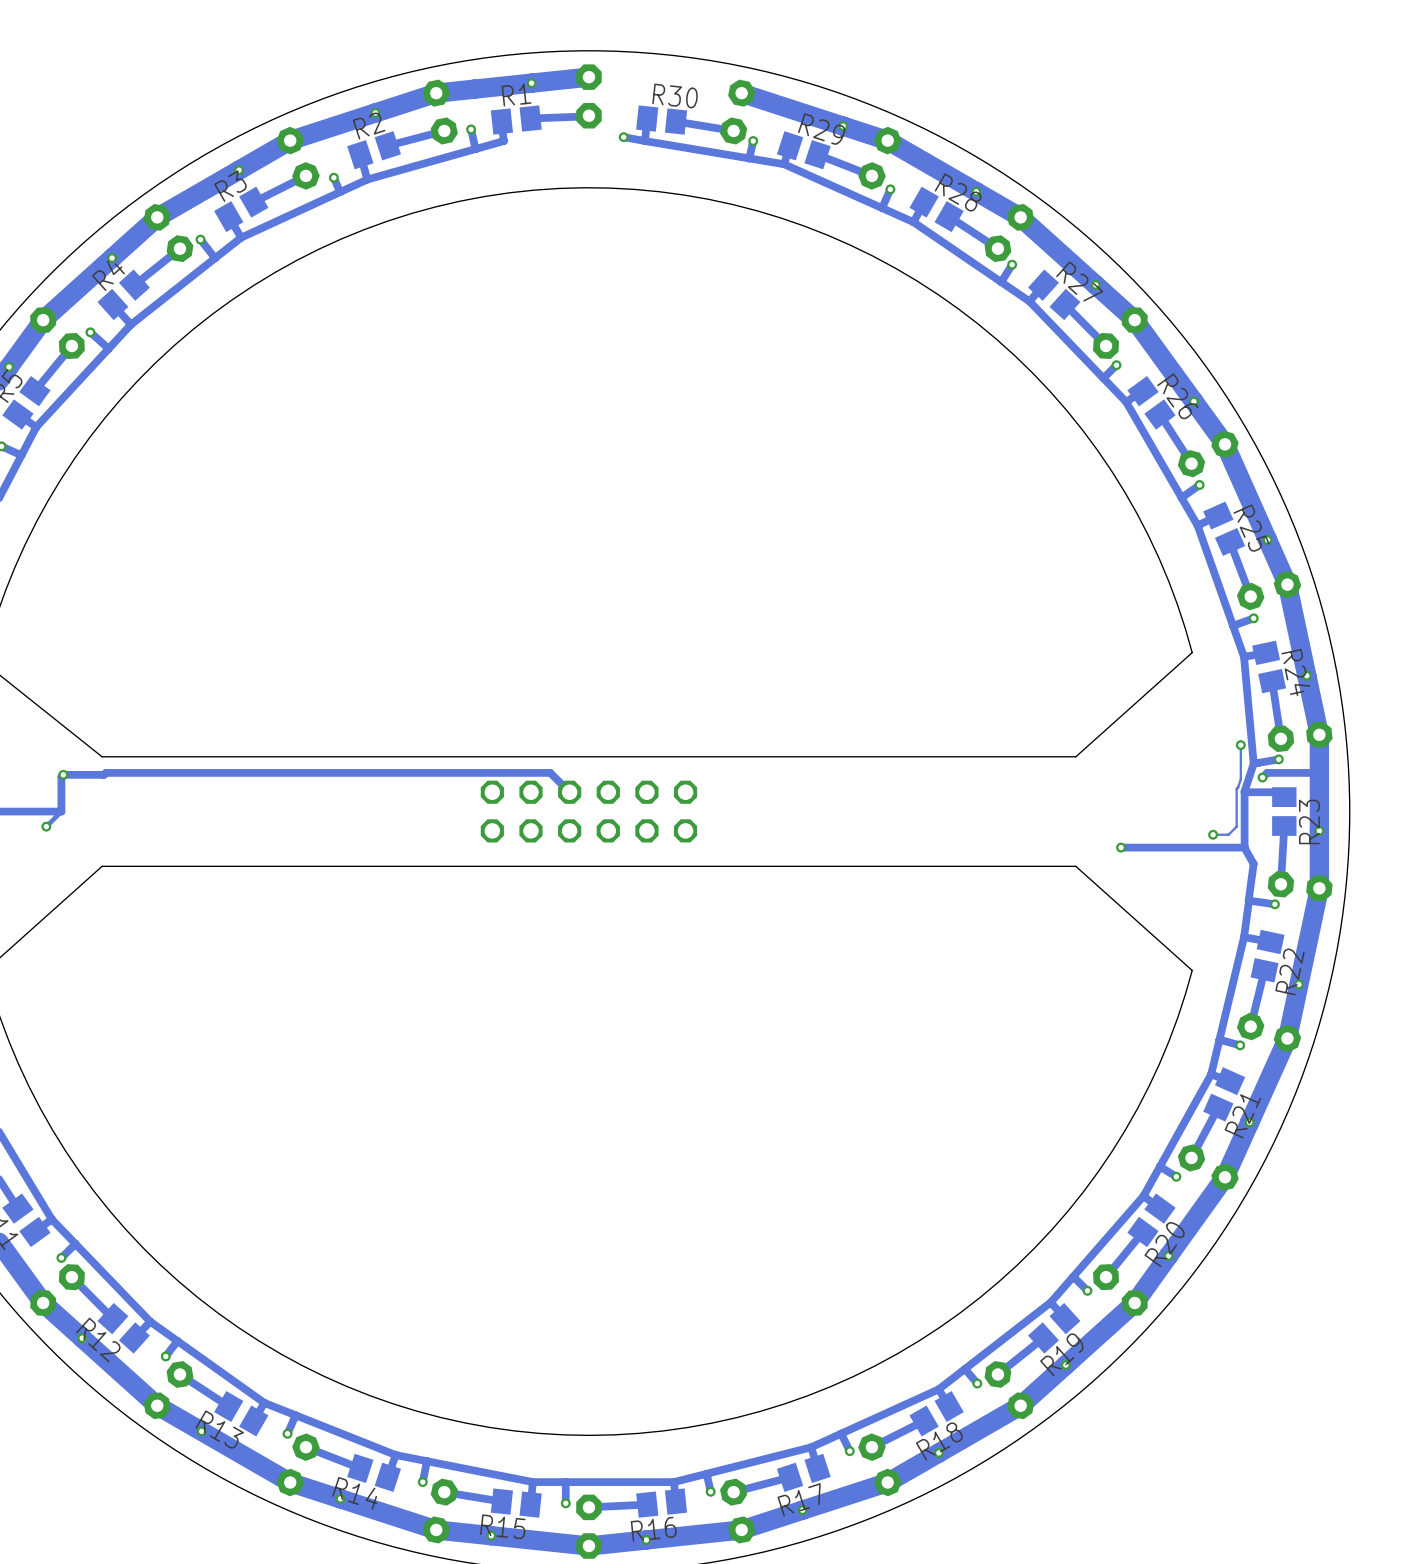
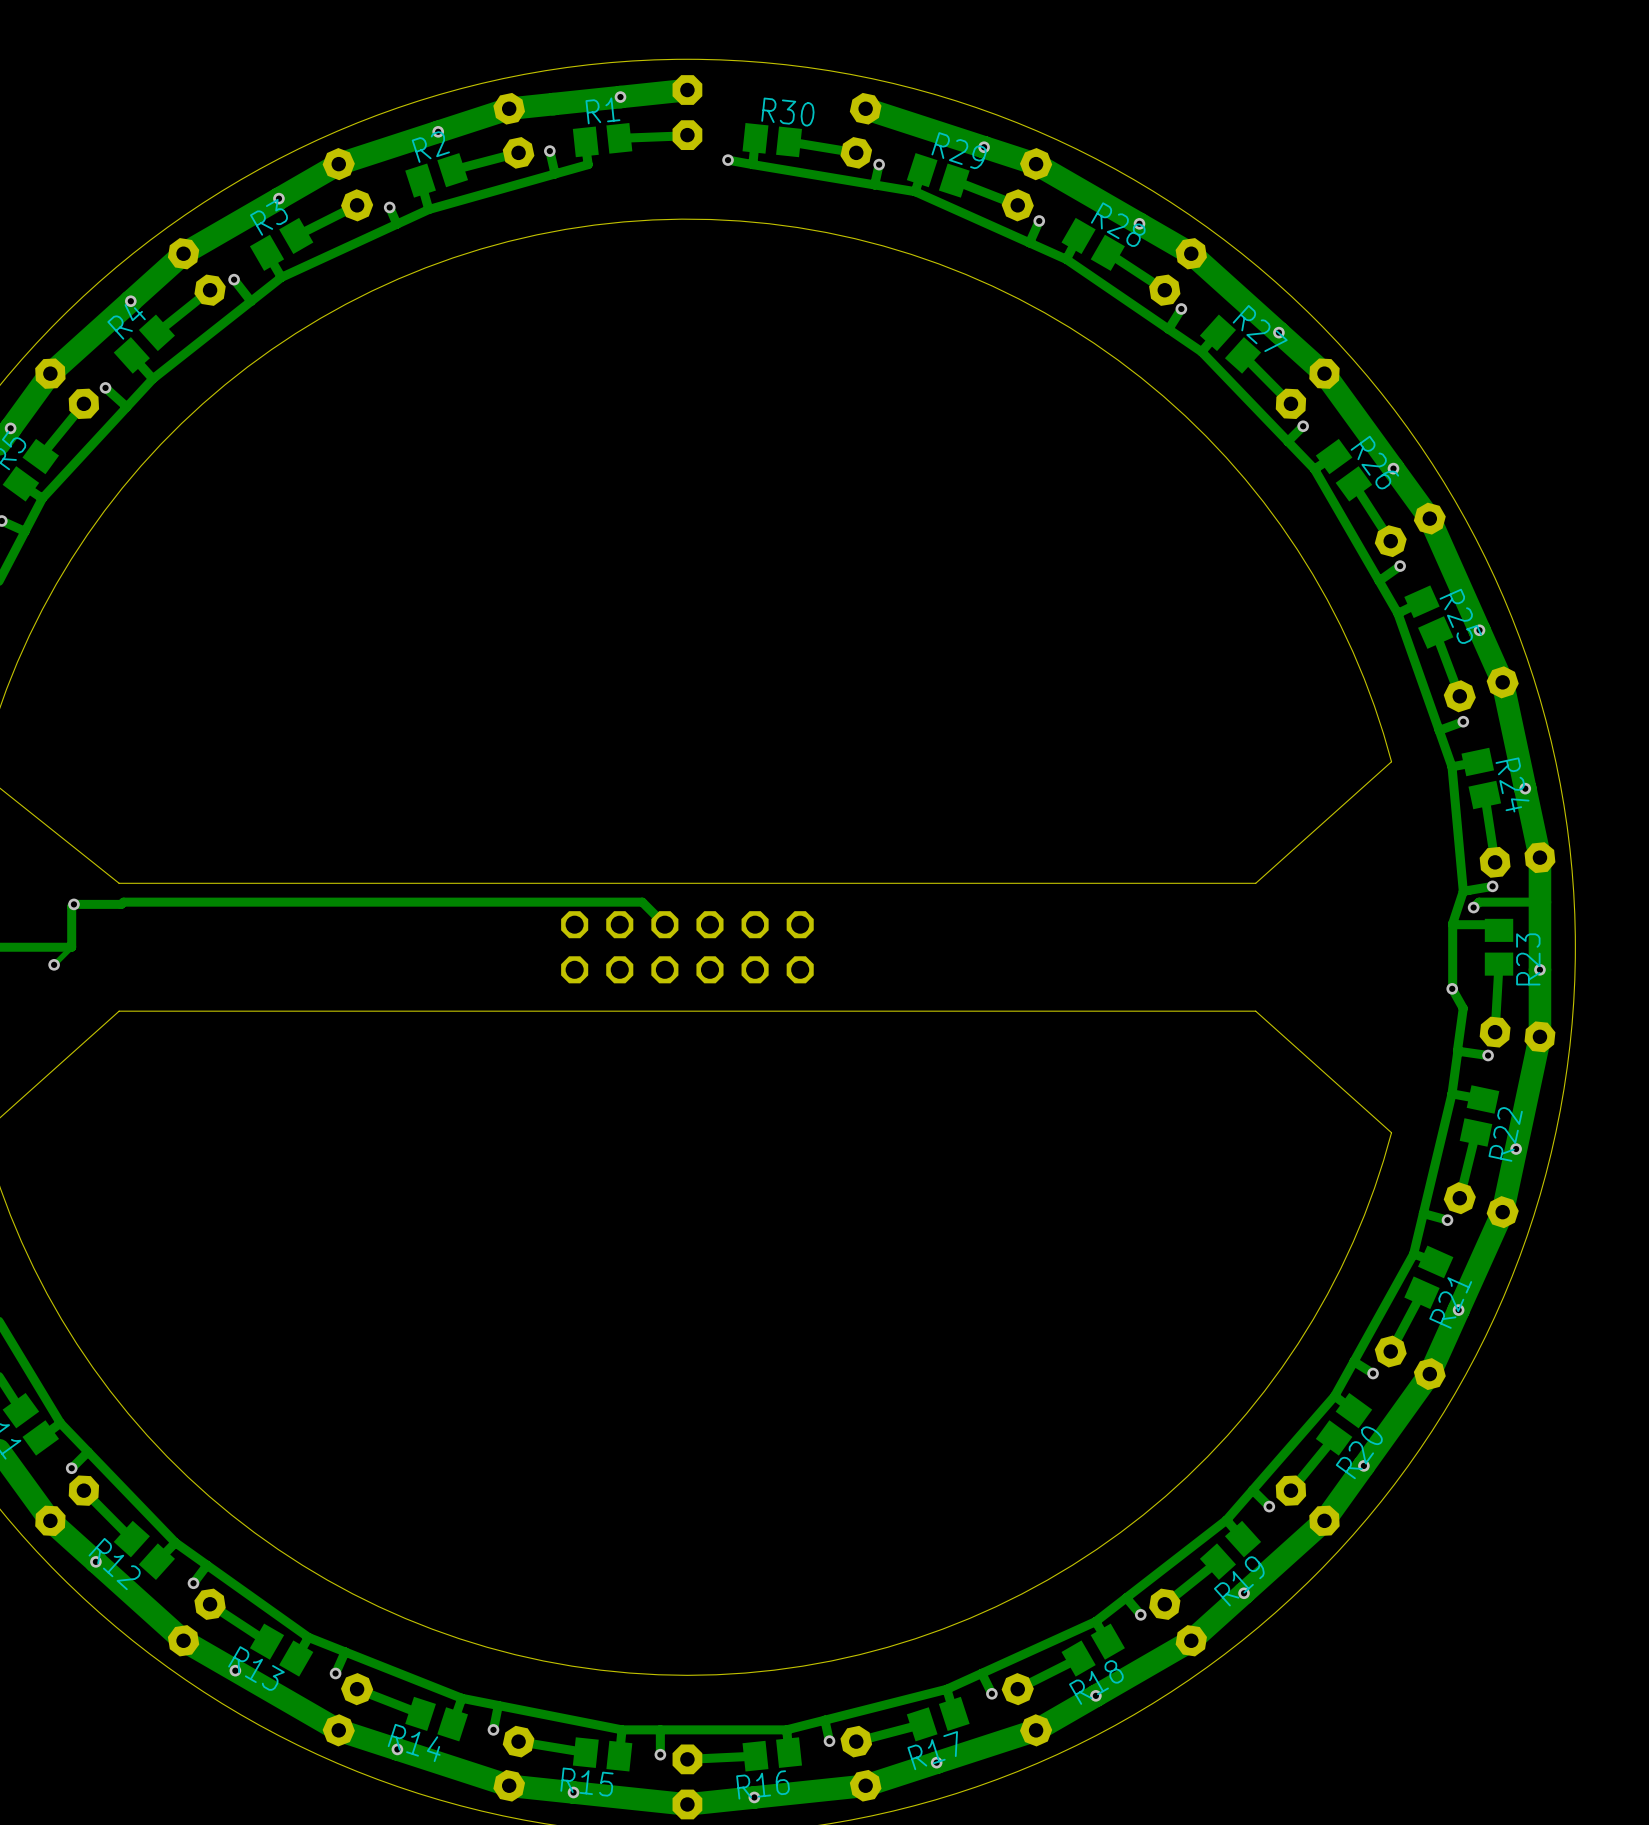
track: (1240, 745) (1240, 779) (1236, 788) (1236, 826) (1228, 834) (1213, 834) -> none
via: (1240, 745) -> none
via position: (1213, 834) -> (1452, 988)
via: (1121, 847) -> none
track: (1244, 847) (1121, 847) -> none

